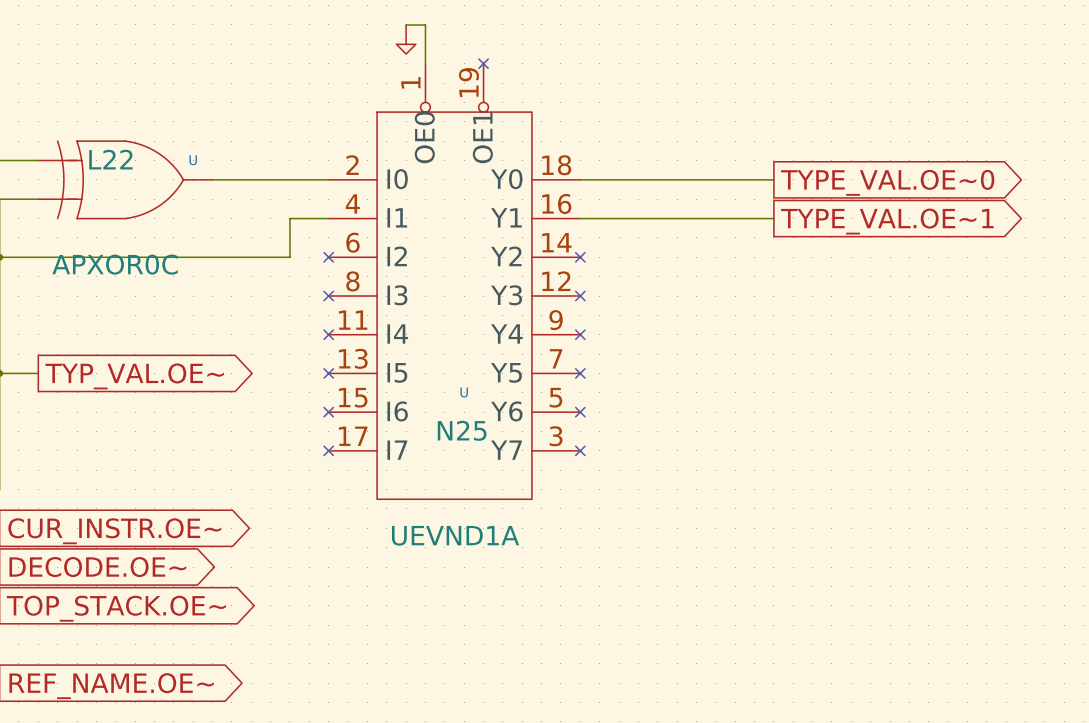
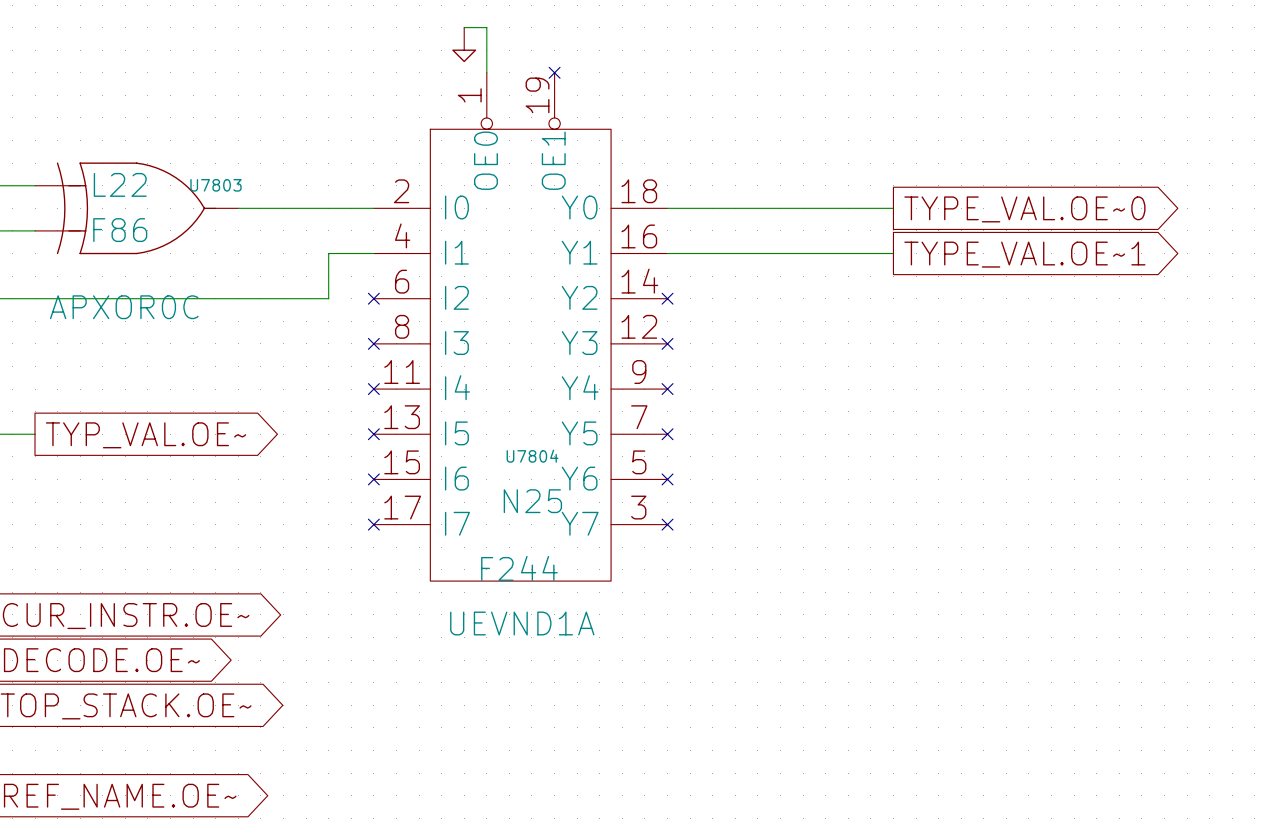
U name: U (193, 160) -> U7803 (215, 185)
U value: none -> F86 (120, 230)
U name: U (464, 392) -> U7804 (532, 456)
U value: none -> F244 (519, 568)

